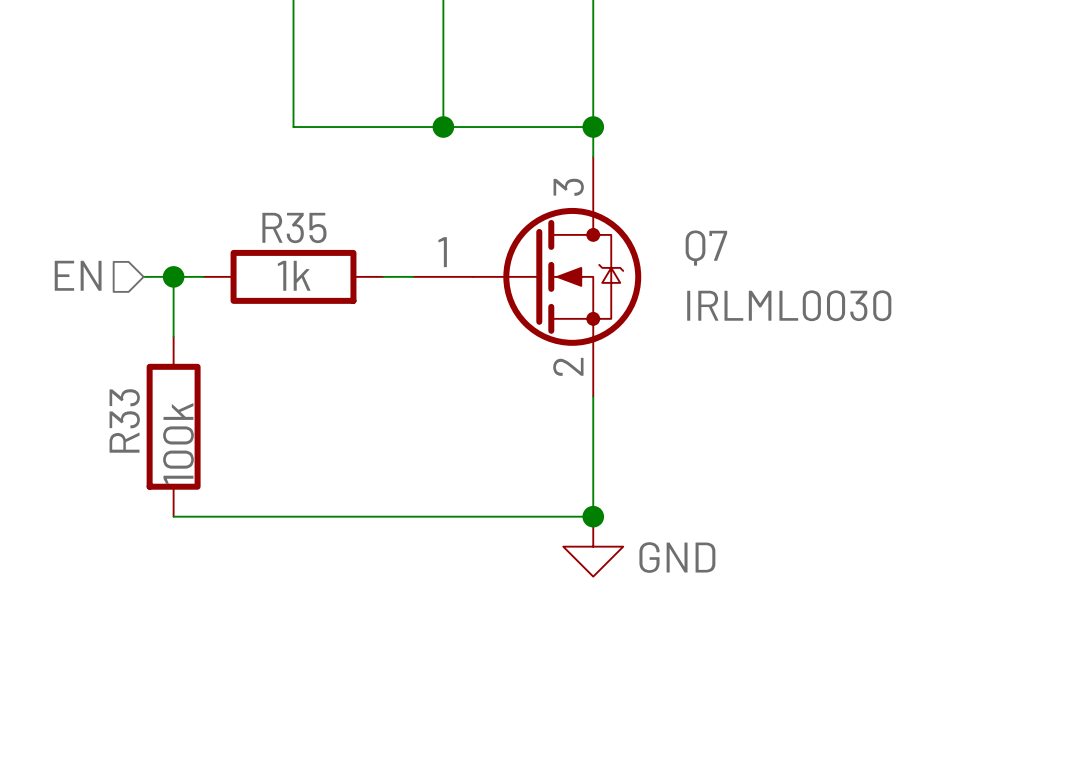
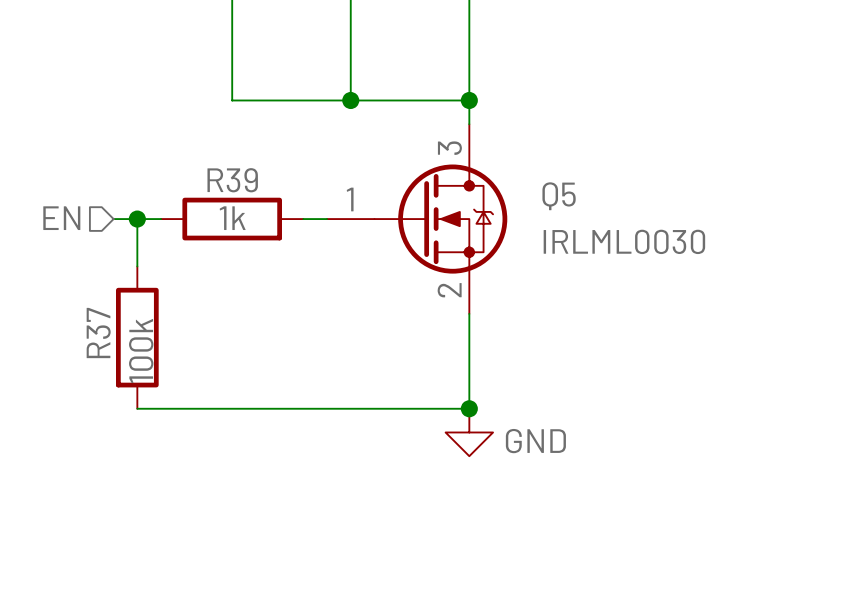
R35 name: R35 (294, 227) -> R39 (232, 180)
Q7 name: Q7 (706, 248) -> Q5 (559, 196)
R33 name: R33 (124, 420) -> R37 (98, 333)

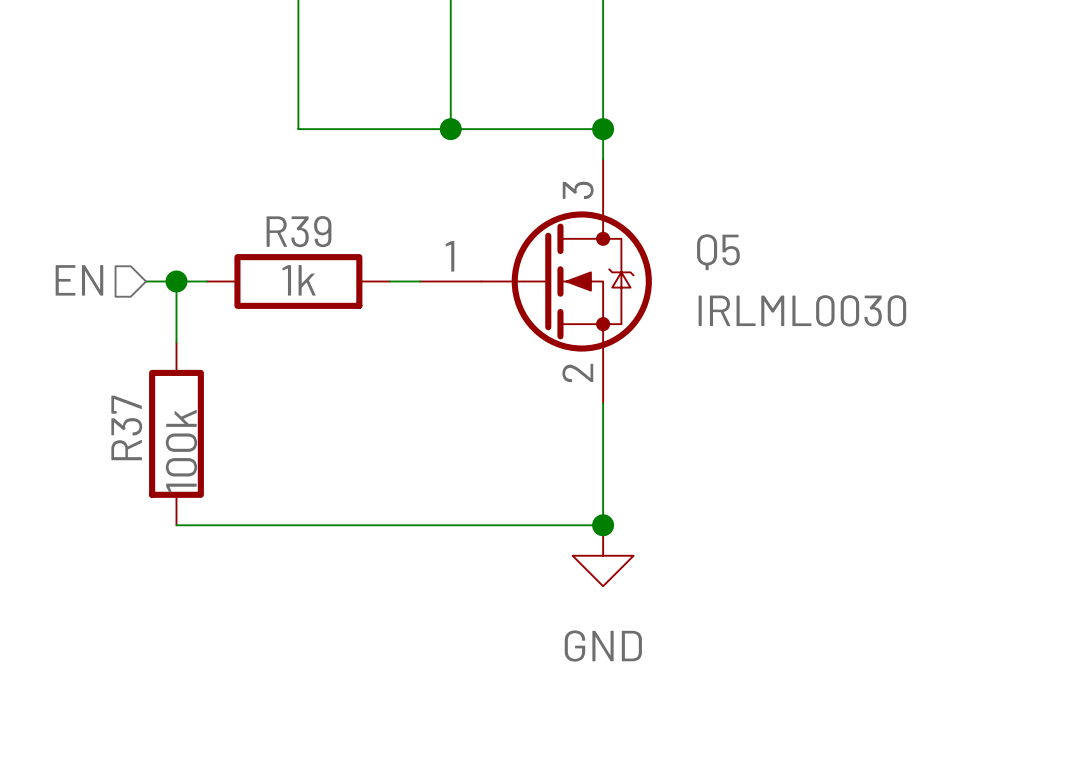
power symbol text position: GND (535, 441) -> GND (603, 646)

